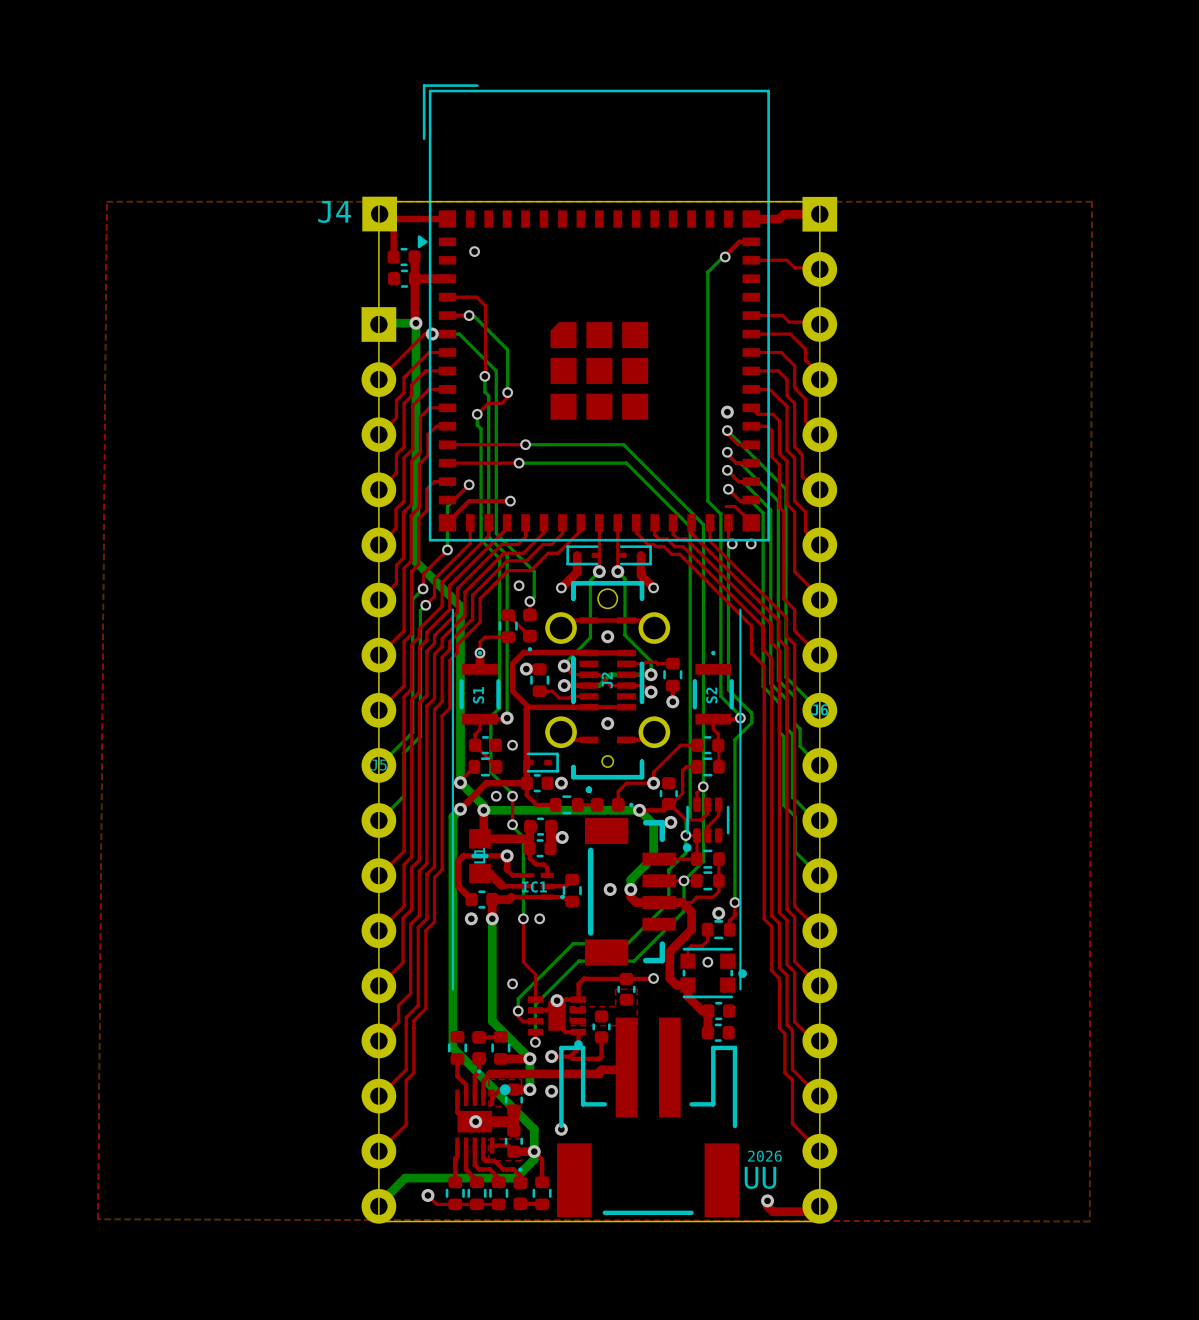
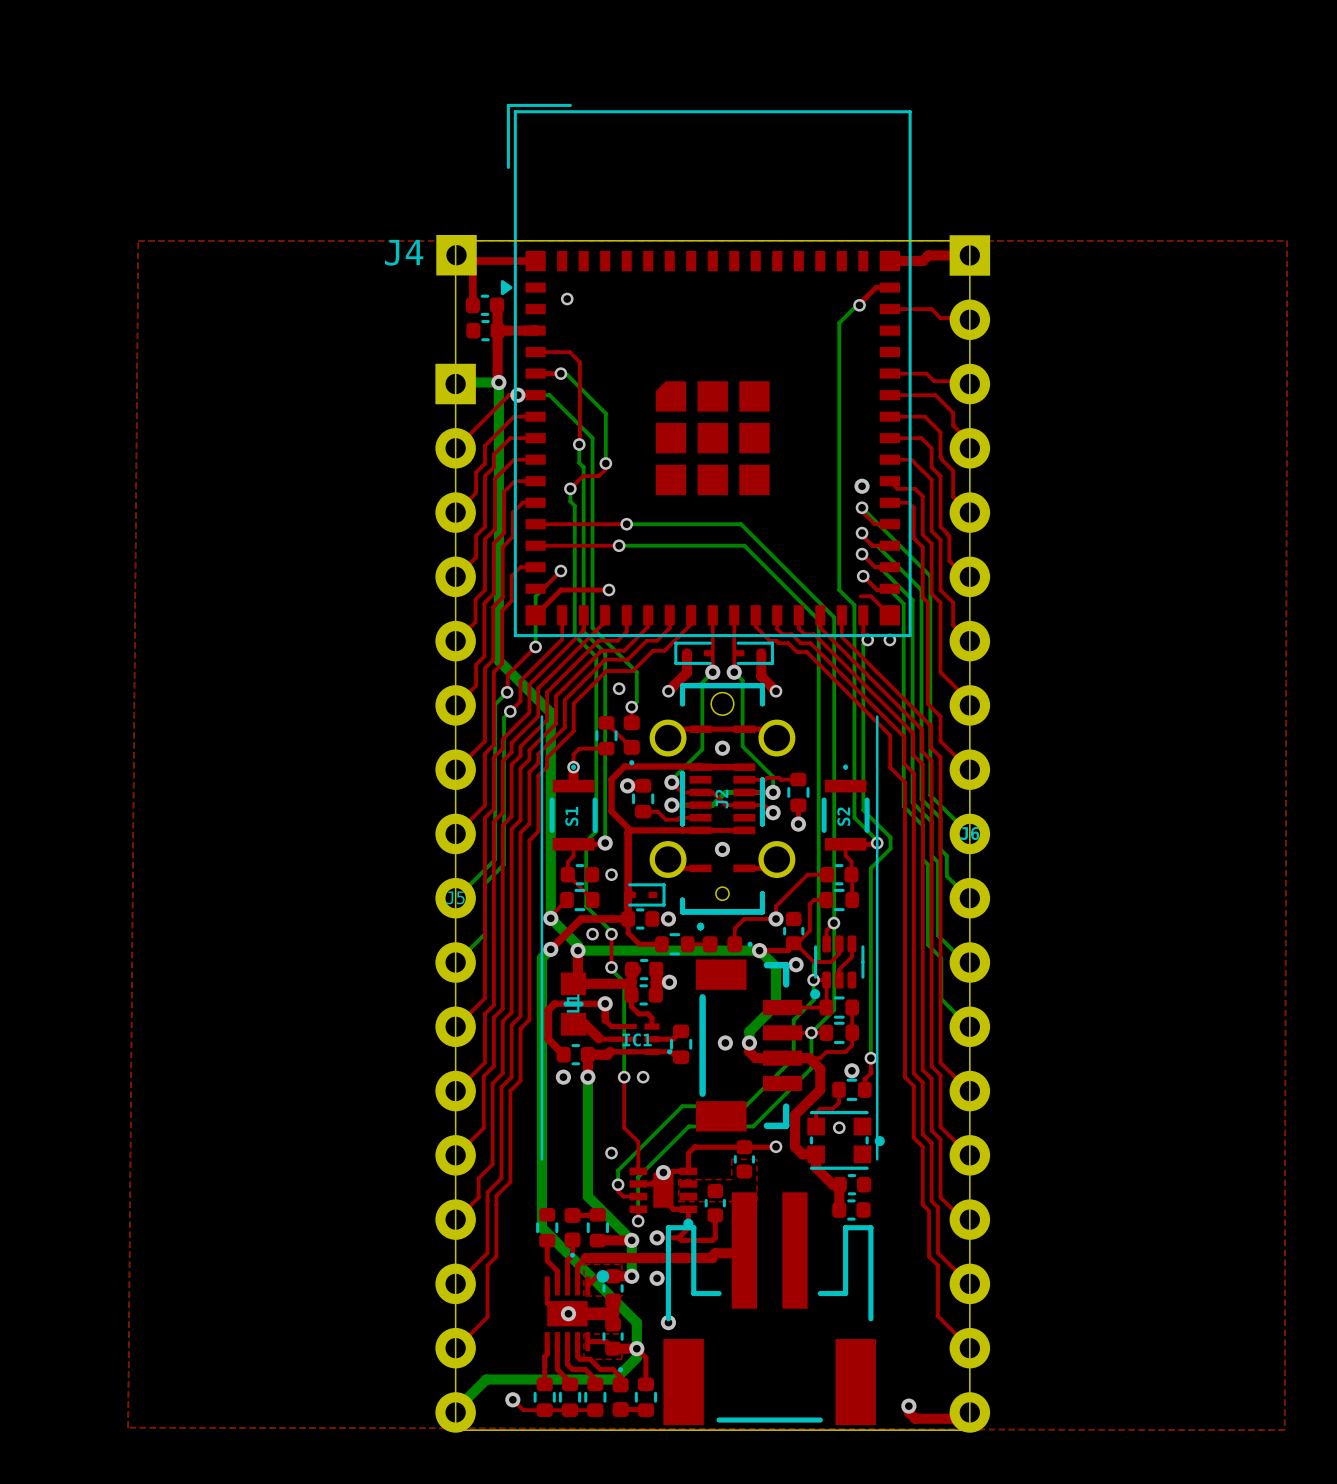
text: 2026 (764, 1156) -> none
text: UU (760, 1177) -> none

